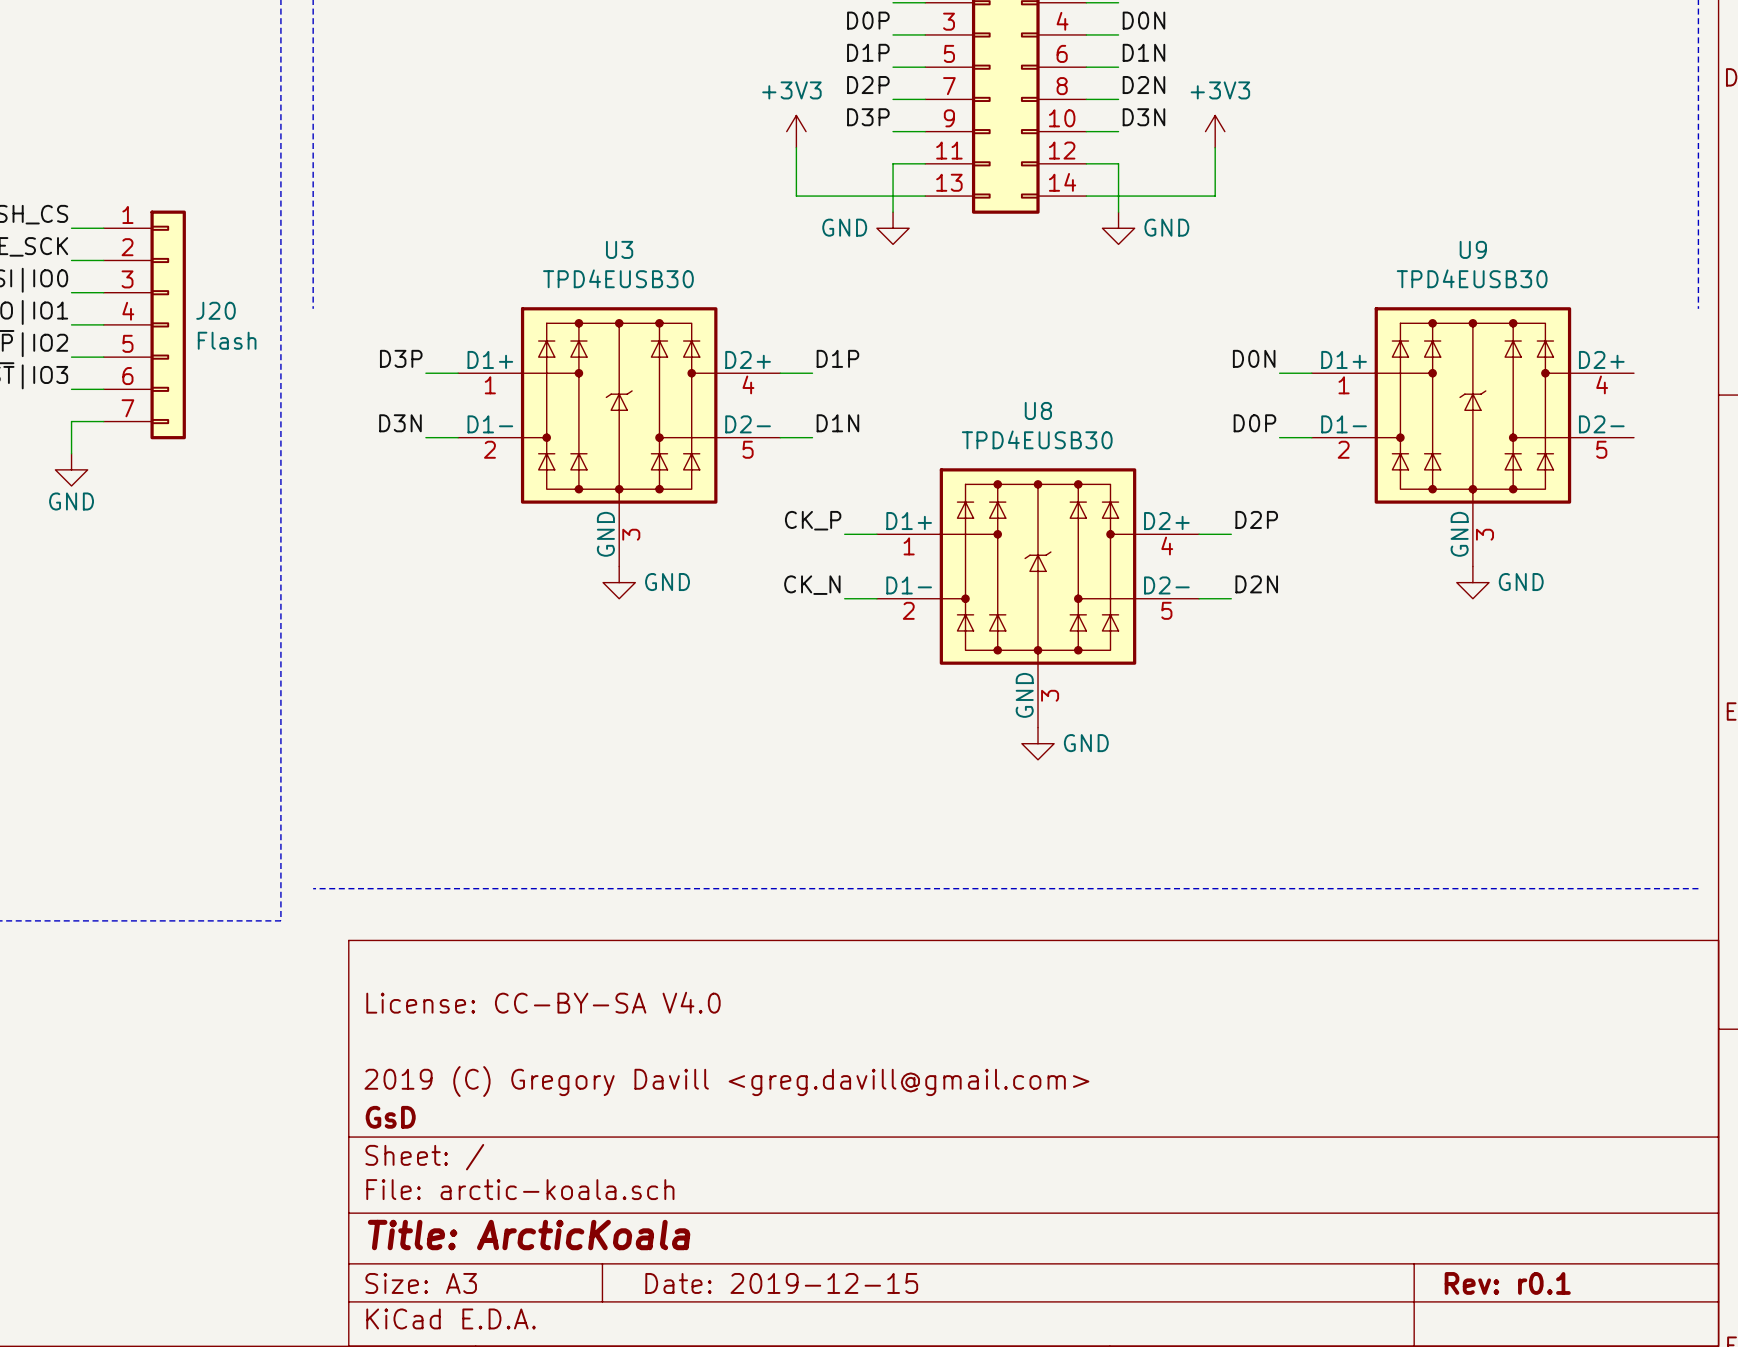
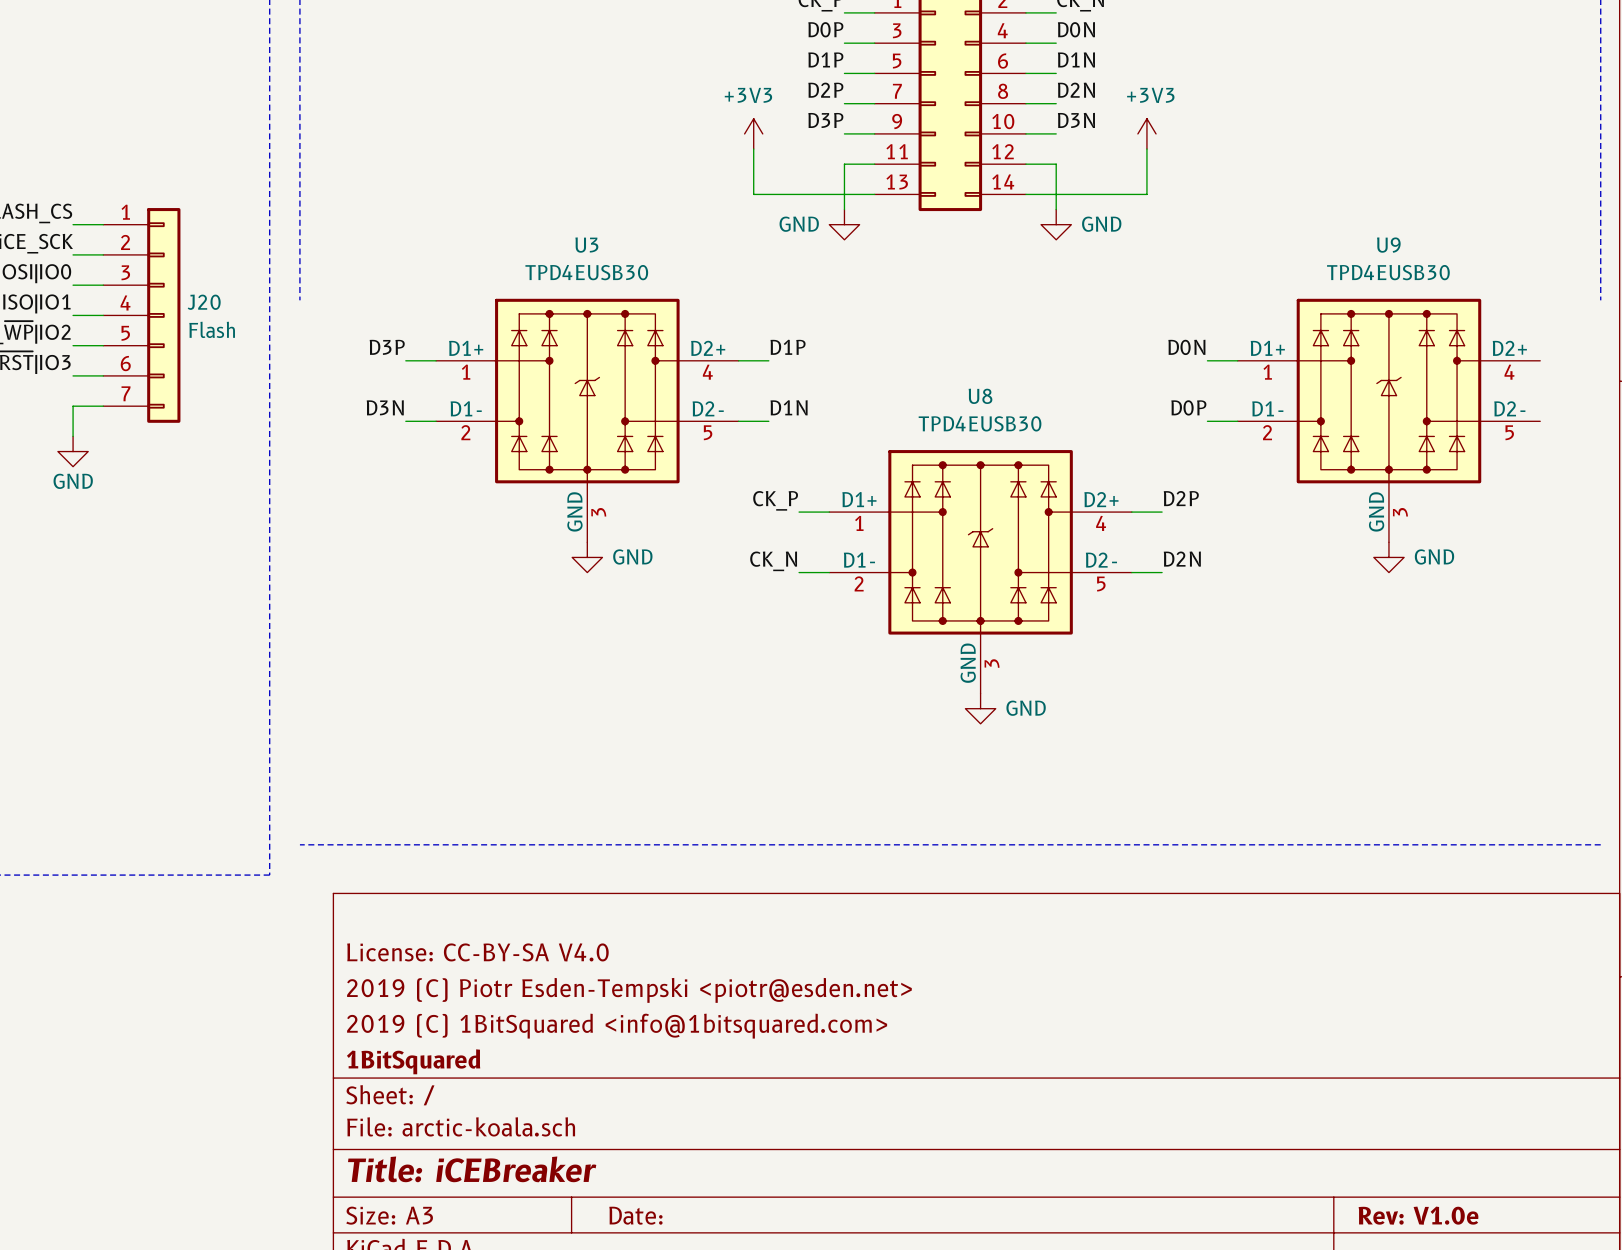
title block: none -> 2019 (C) Piotr Esden-Tempski <piotr@esden.net> (629, 990)
title block: 2019 (C) Gregory Davill <greg.davill@gmail.com> (726, 1081) -> 2019 (C) 1BitSquared <info@1bitsquared.com> (617, 1026)
title block: GsD (390, 1117) -> 1BitSquared (413, 1061)
title block: Title: ArcticKoala (529, 1235) -> Title: iCEBreaker (472, 1169)
title block: Date: 2019-12-15 (781, 1283) -> Date: (635, 1215)
title block: Rev: r0.1 (1507, 1283) -> Rev: V1.0e (1418, 1215)

